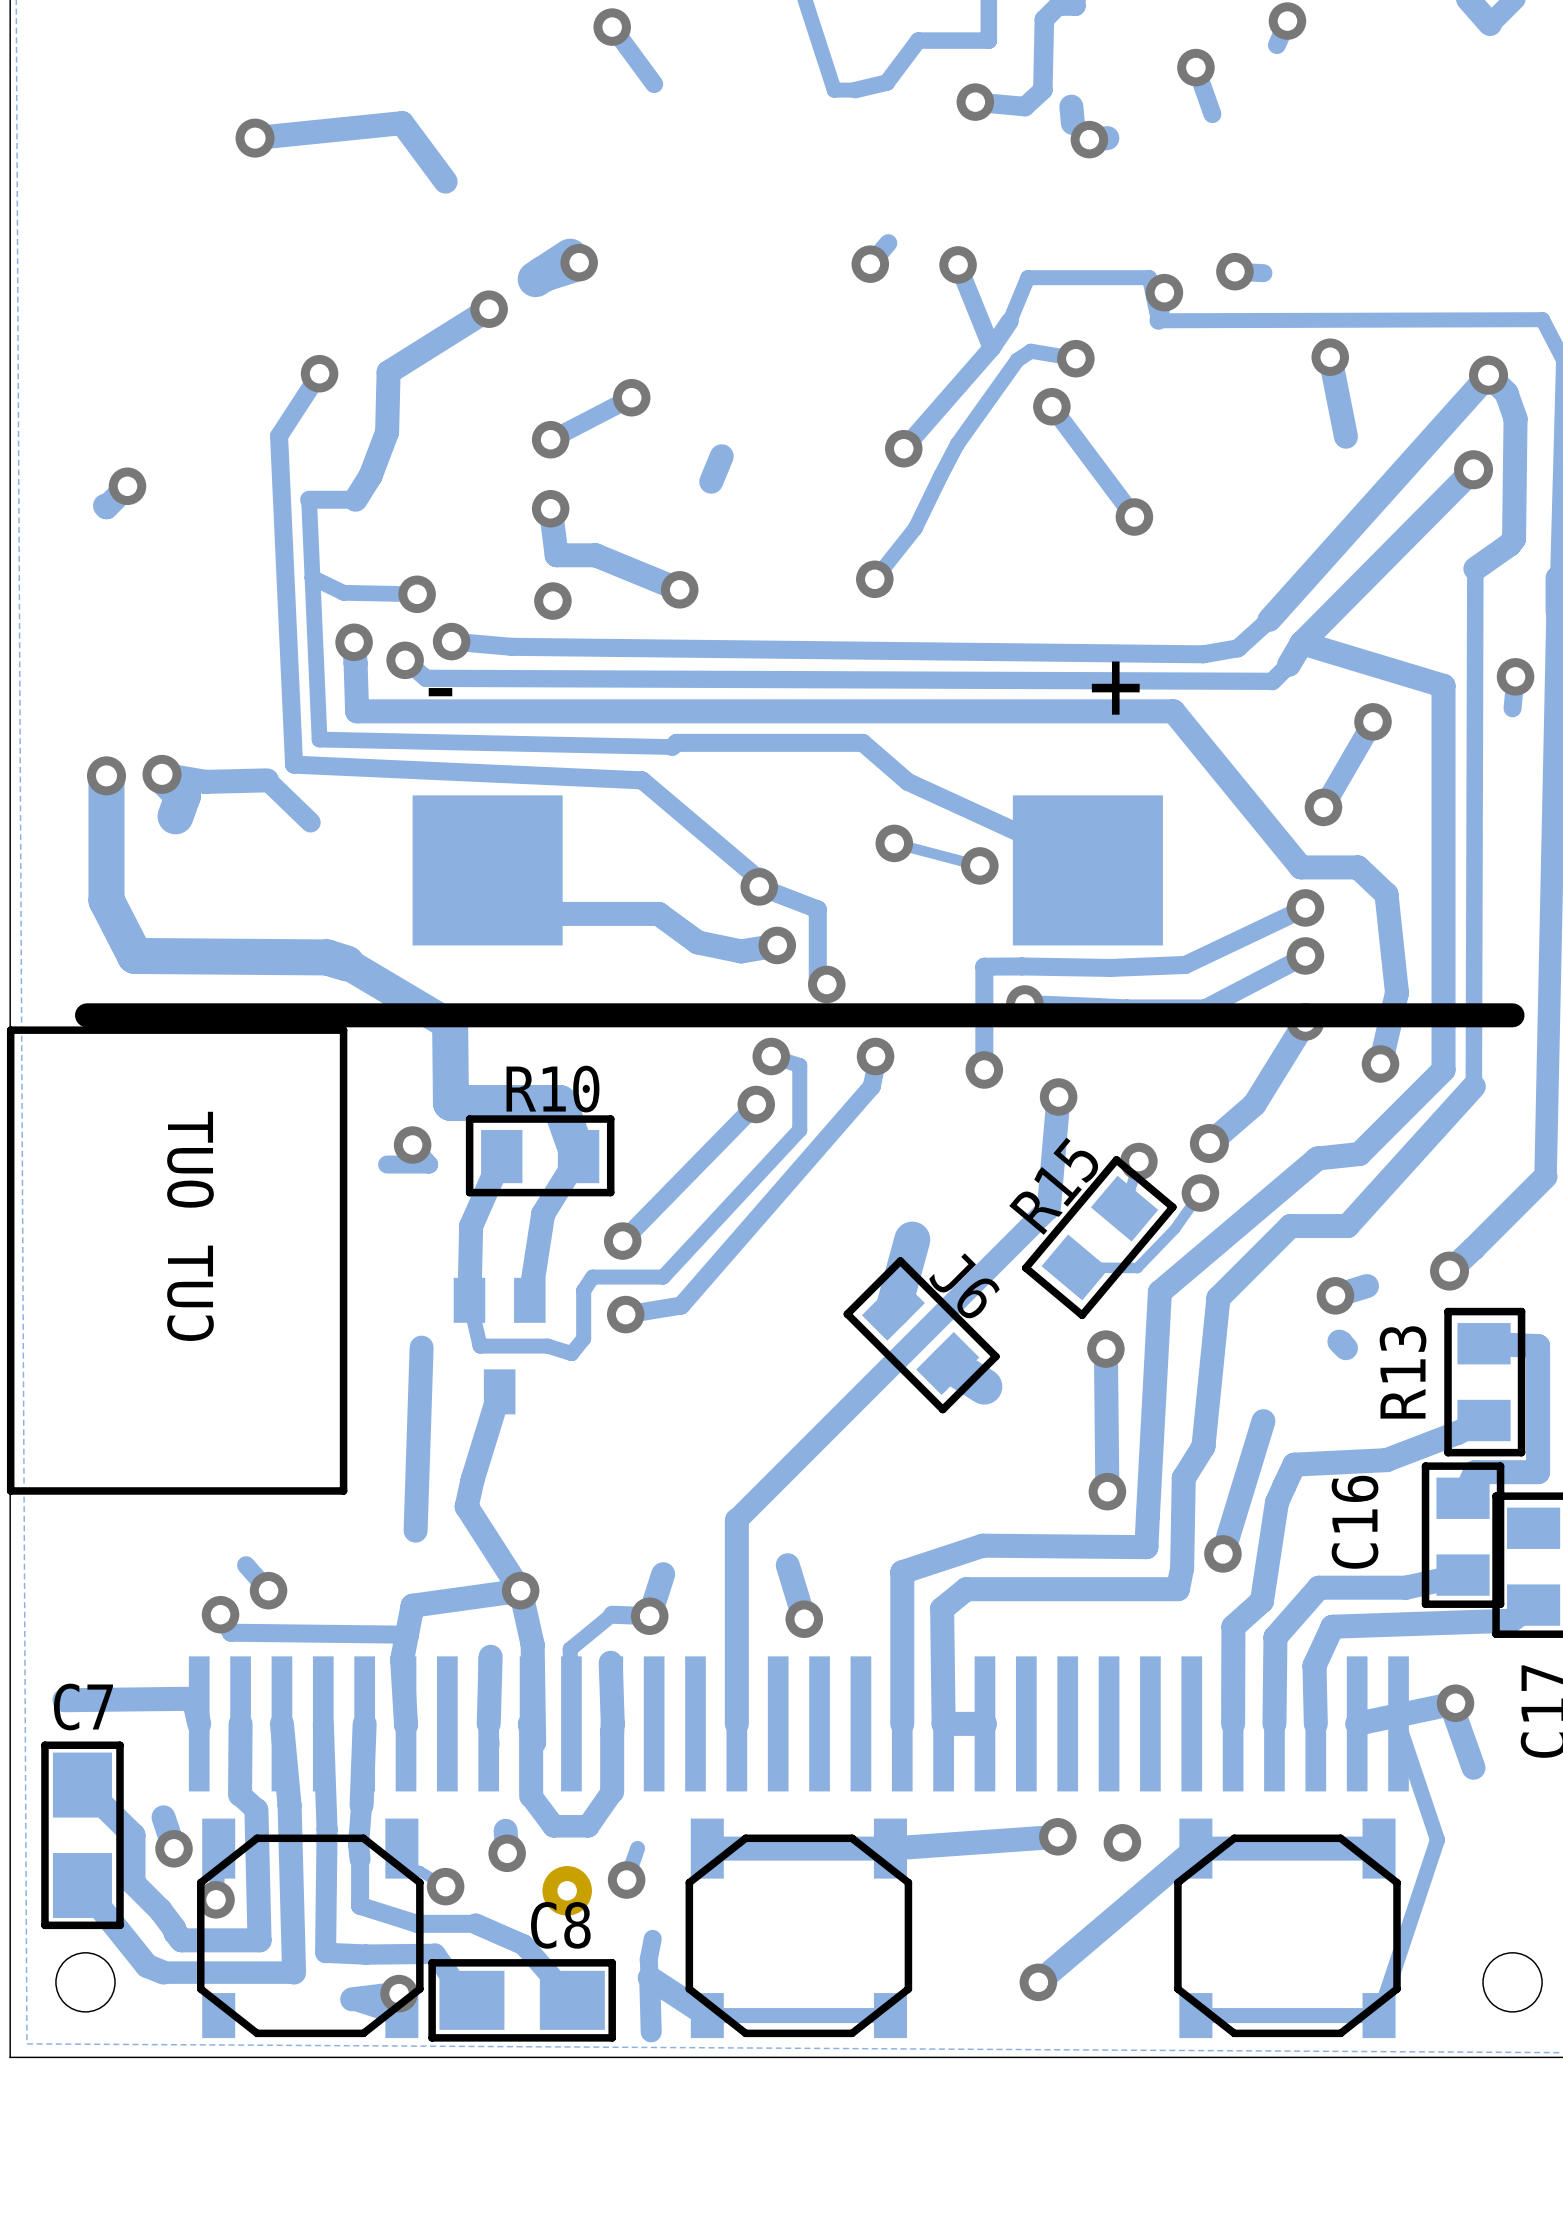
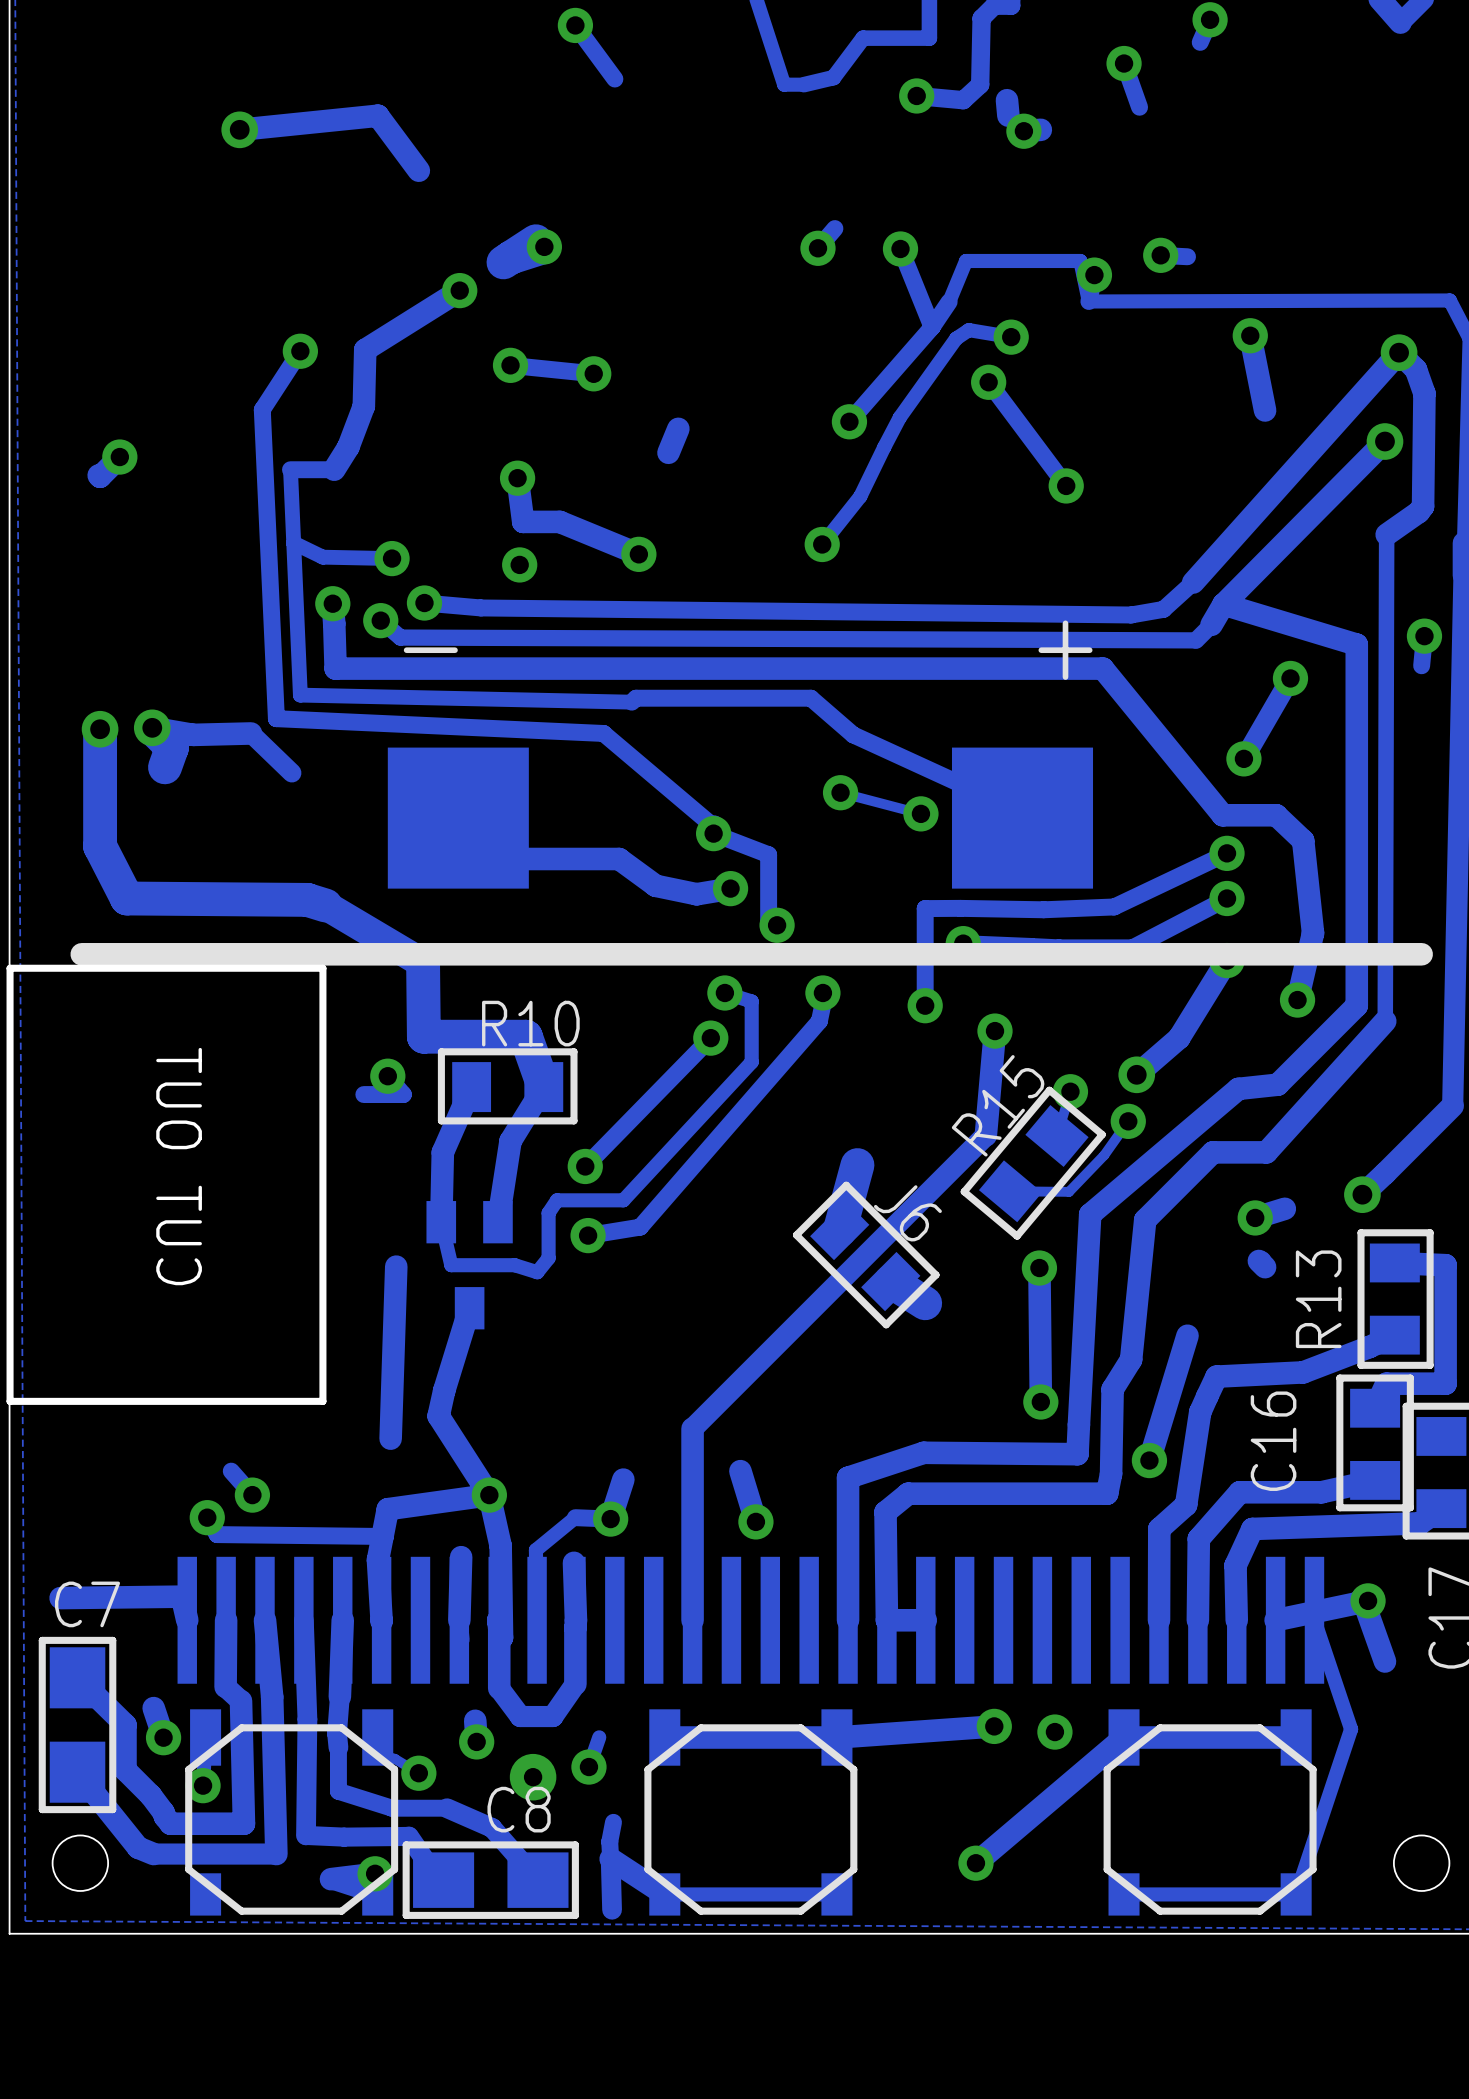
track: (631, 397) (550, 439) -> (593, 373) (510, 365)
via position: (550, 439) -> (510, 365)

